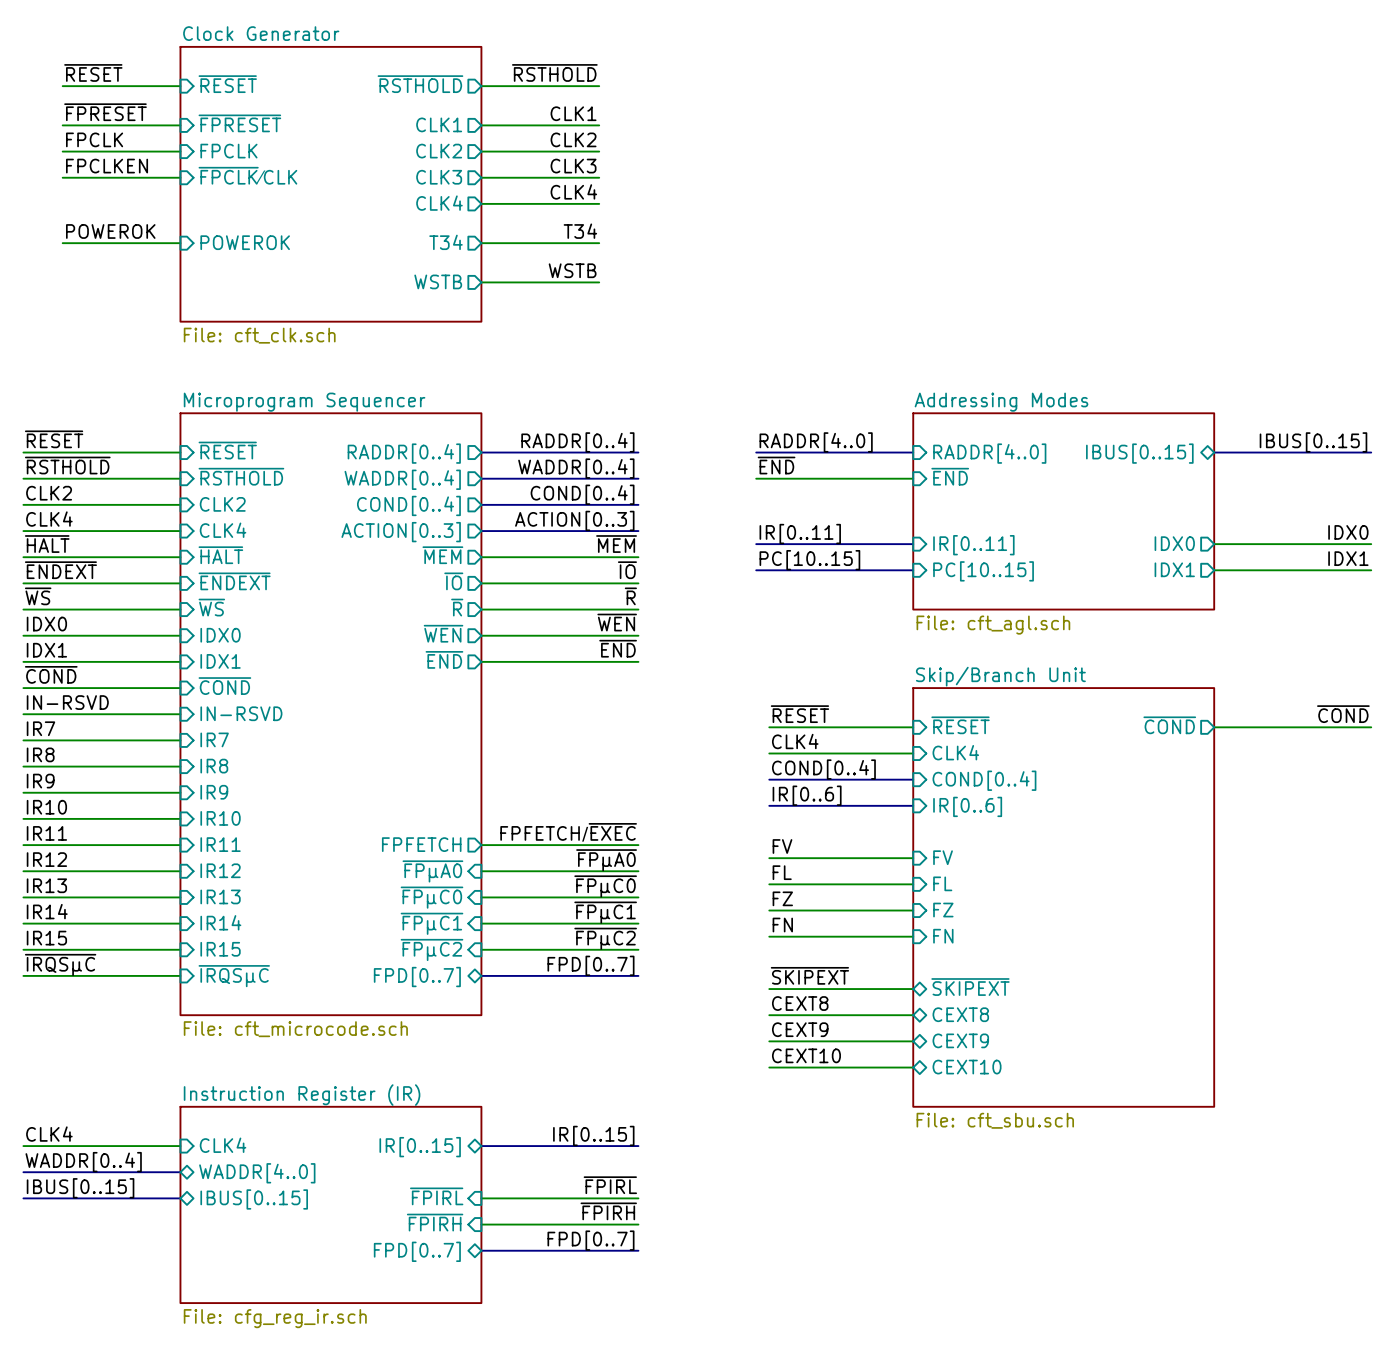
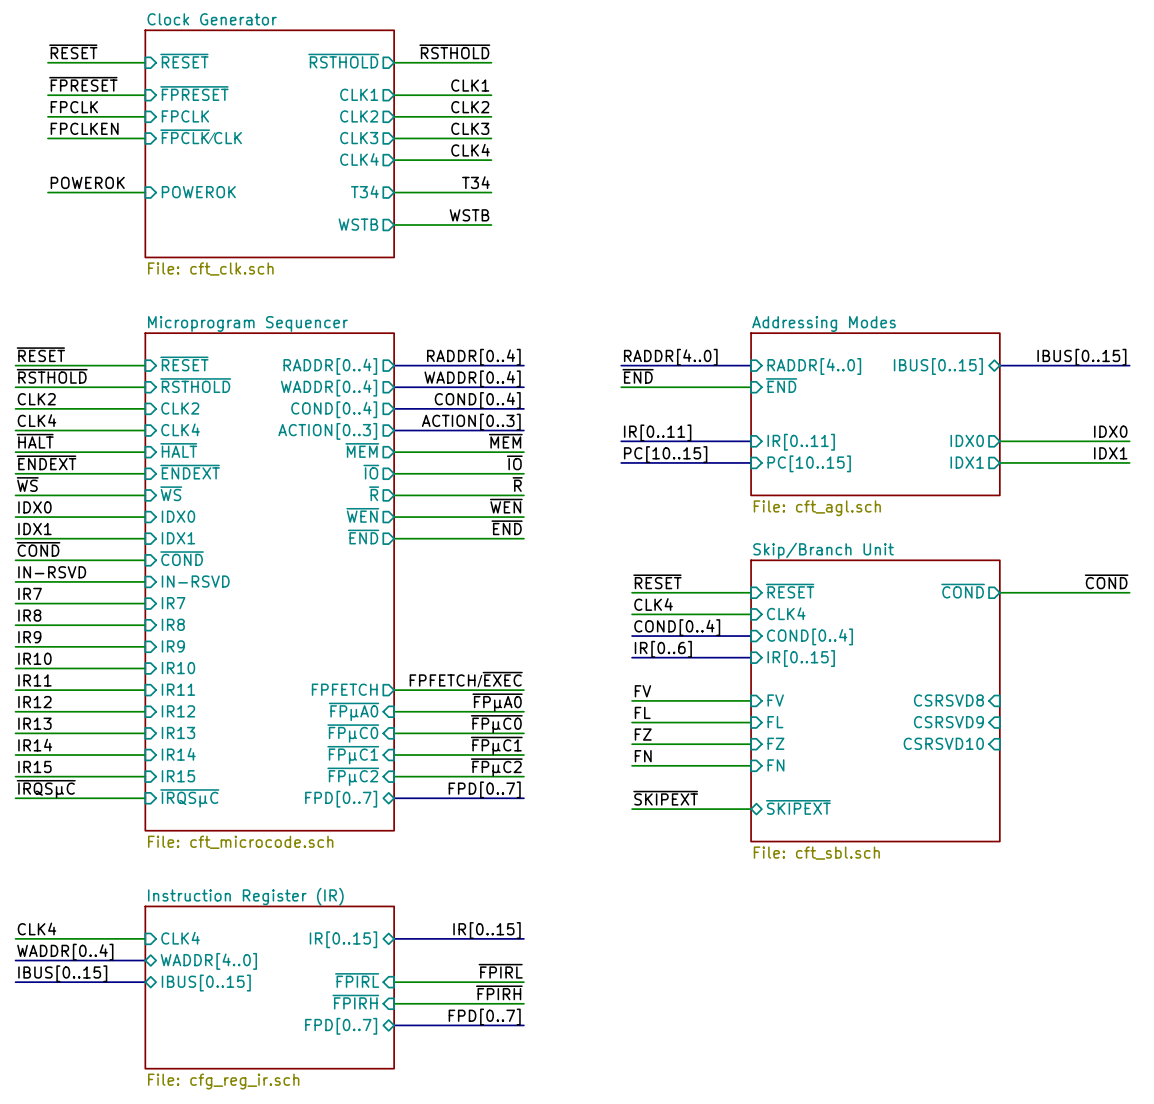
sheet pin: IR[0..6] (967, 806) -> IR[0..15] (801, 658)
sheet pin: none -> CSRSVD8 (948, 700)
sheet Skip/Branch Unit: none -> File: cft_sbl.sch (875, 700)
sheet pin: none -> CSRSVD9 (948, 722)
sheet Skip/Branch Unit: File: cft_sbu.sch (1063, 897) -> none
sheet pin: none -> CSRSVD10 (943, 743)
label: CEXT8 (800, 1003) -> none
sheet pin: CEXT8 (960, 1014) -> none
wire: (769, 1015) (913, 1015) -> none
label: CEXT9 (800, 1029) -> none
sheet pin: CEXT9 (960, 1040) -> none
wire: (769, 1041) (913, 1041) -> none
label: CEXT10 (806, 1055) -> none
wire: (769, 1067) (913, 1067) -> none
sheet pin: CEXT10 (967, 1067) -> none

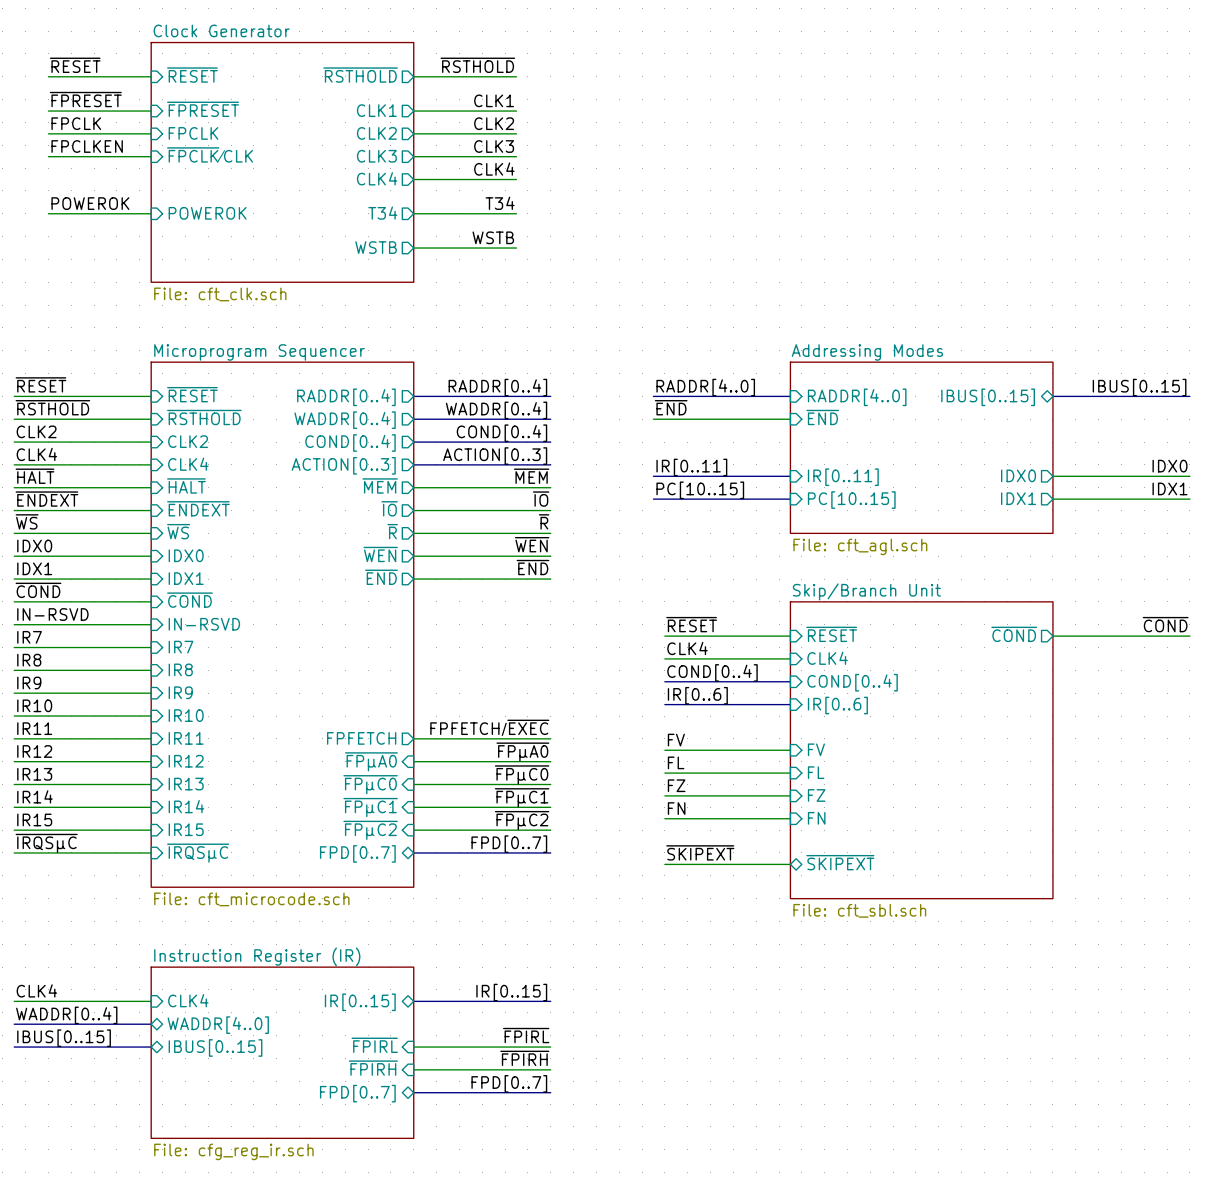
sheet pin: IR[0..15] (801, 658) -> IR[0..6] (837, 705)
sheet pin: CSRSVD8 (948, 700) -> none
sheet pin: CSRSVD9 (948, 722) -> none
sheet pin: CSRSVD10 (943, 743) -> none

